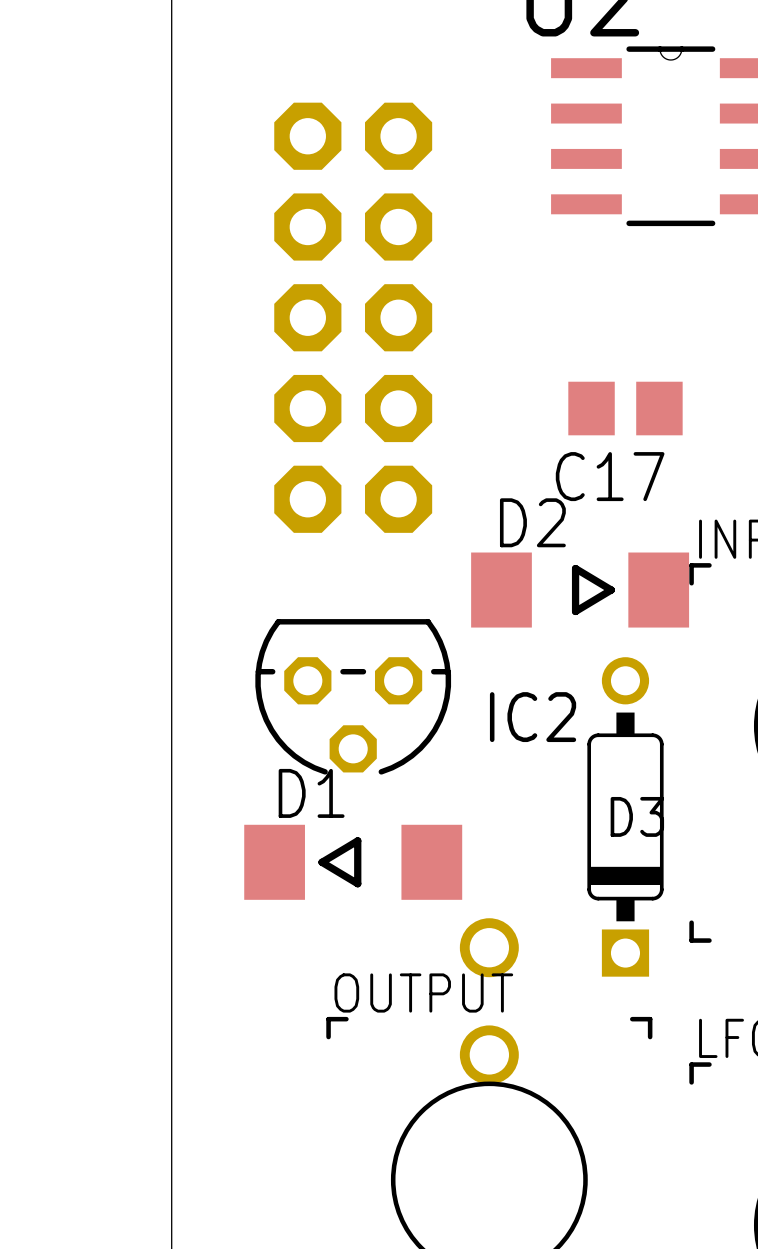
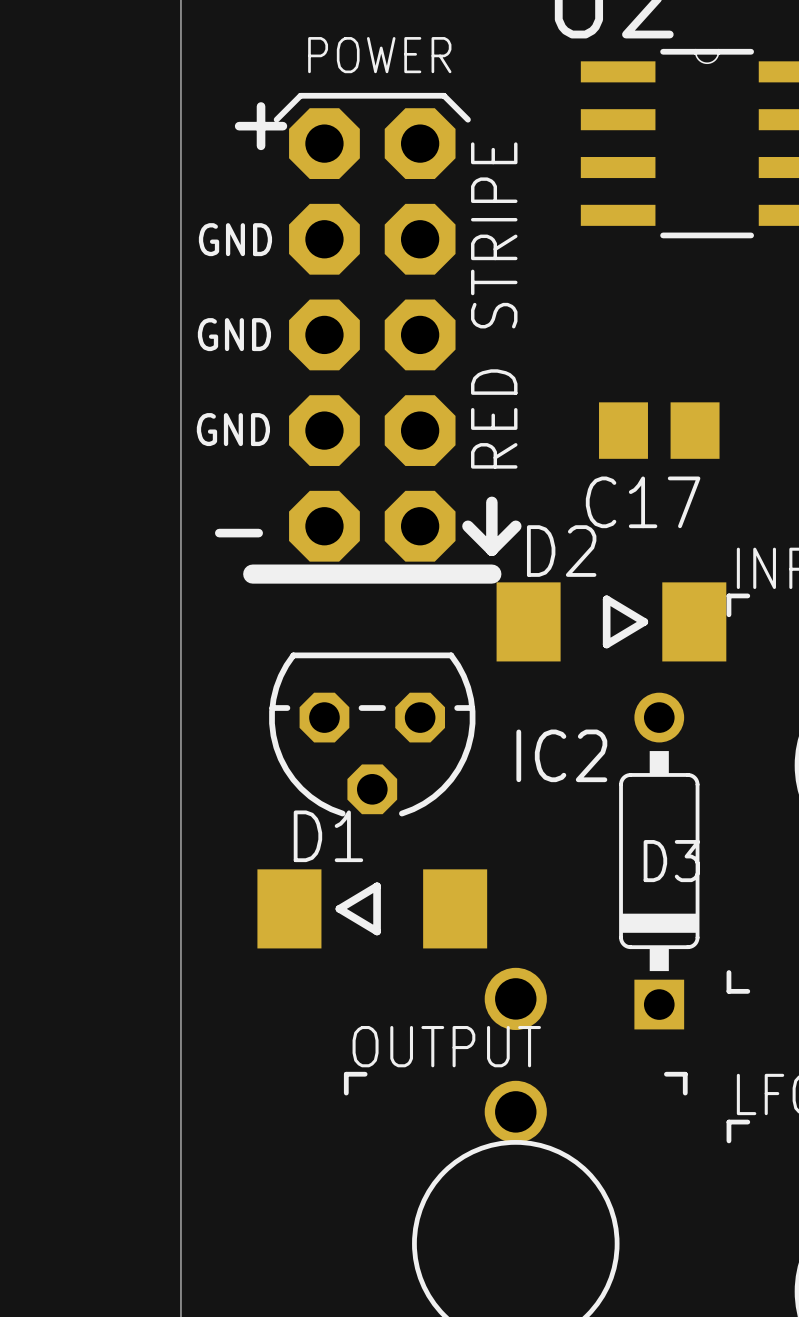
part side: bottom (353, 317) -> top (382, 338)

